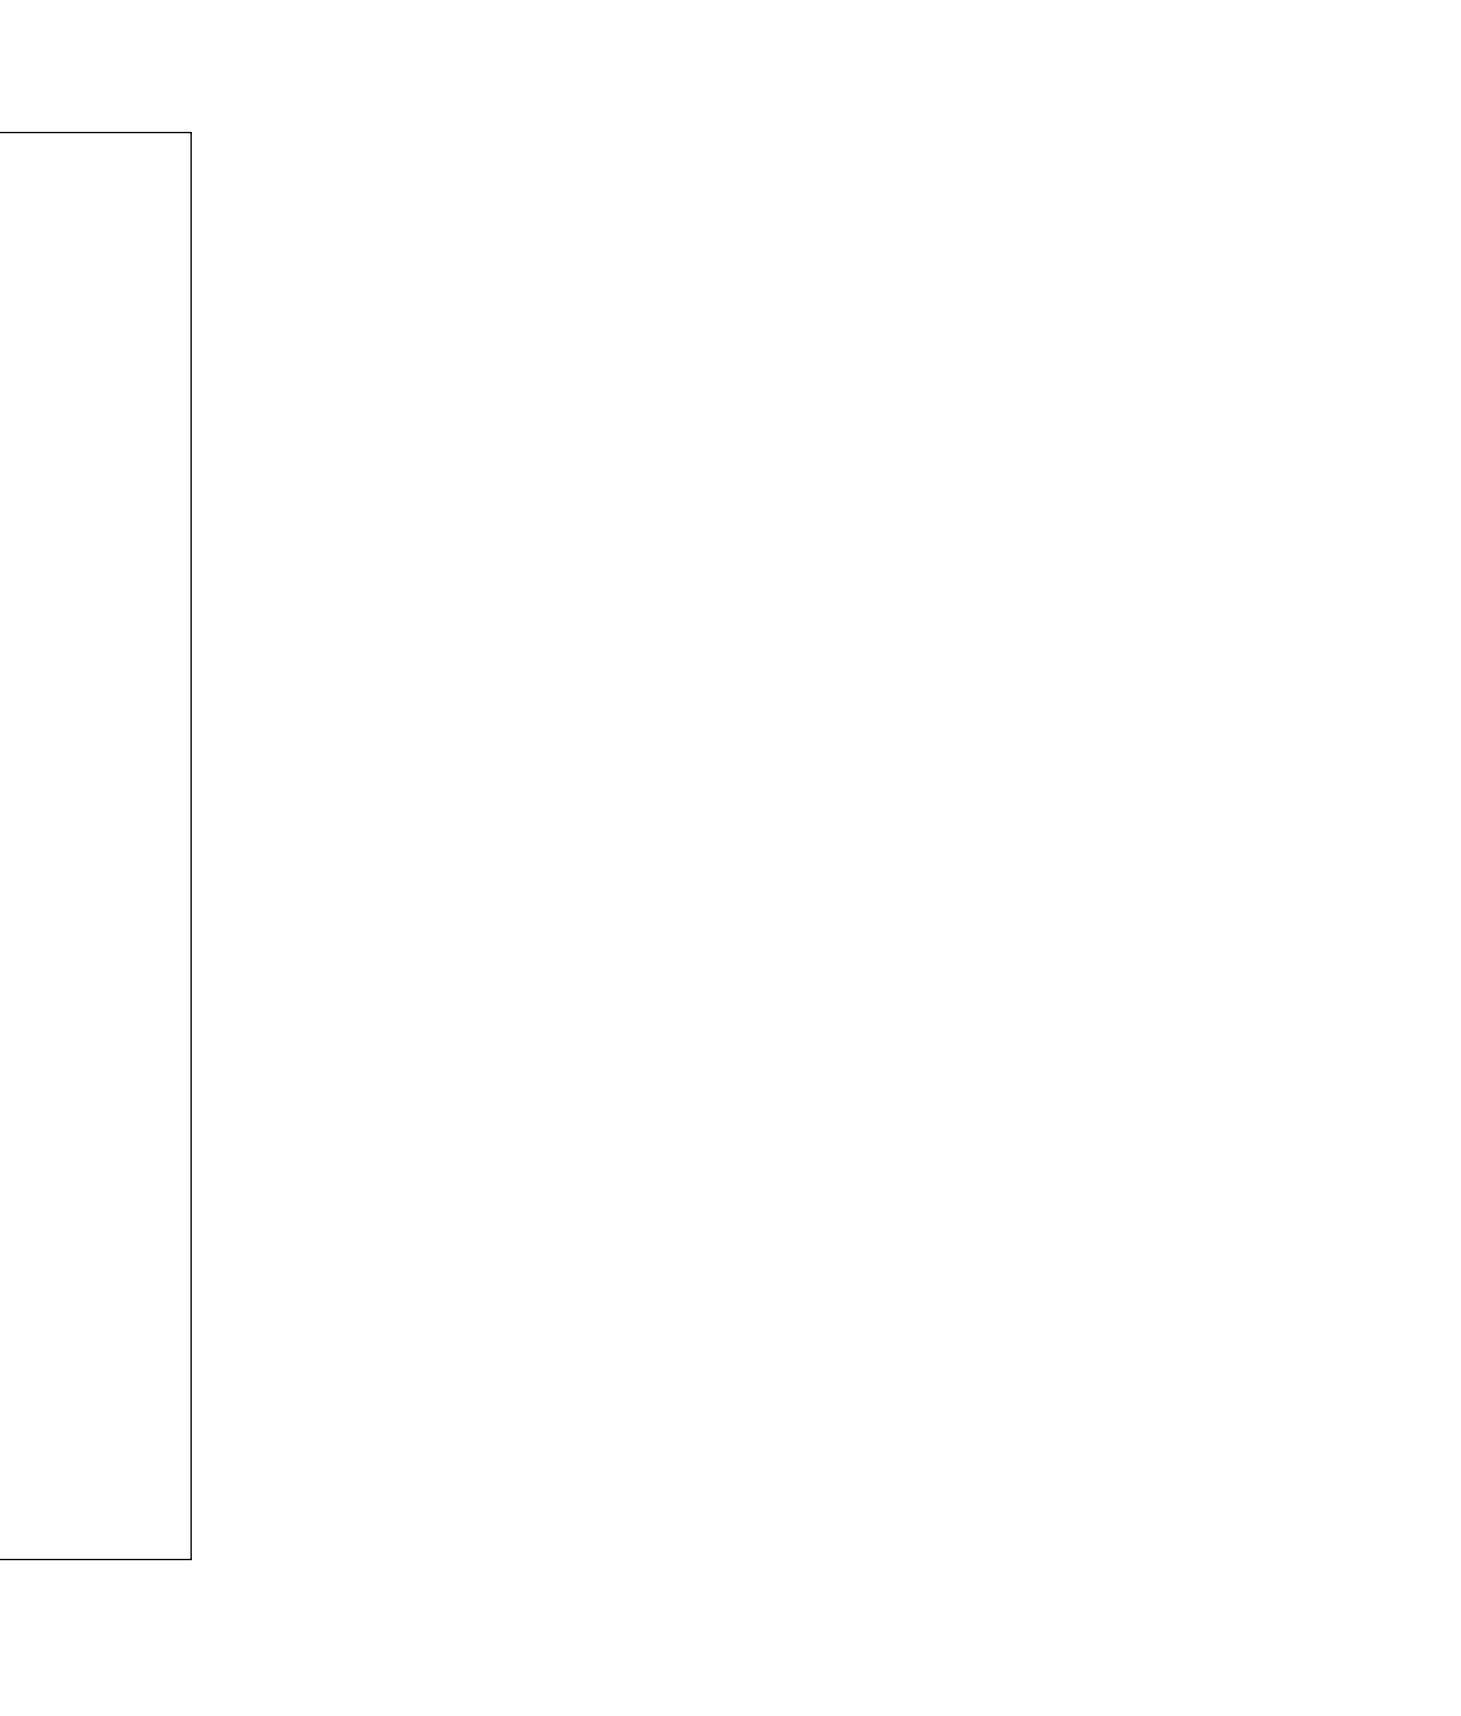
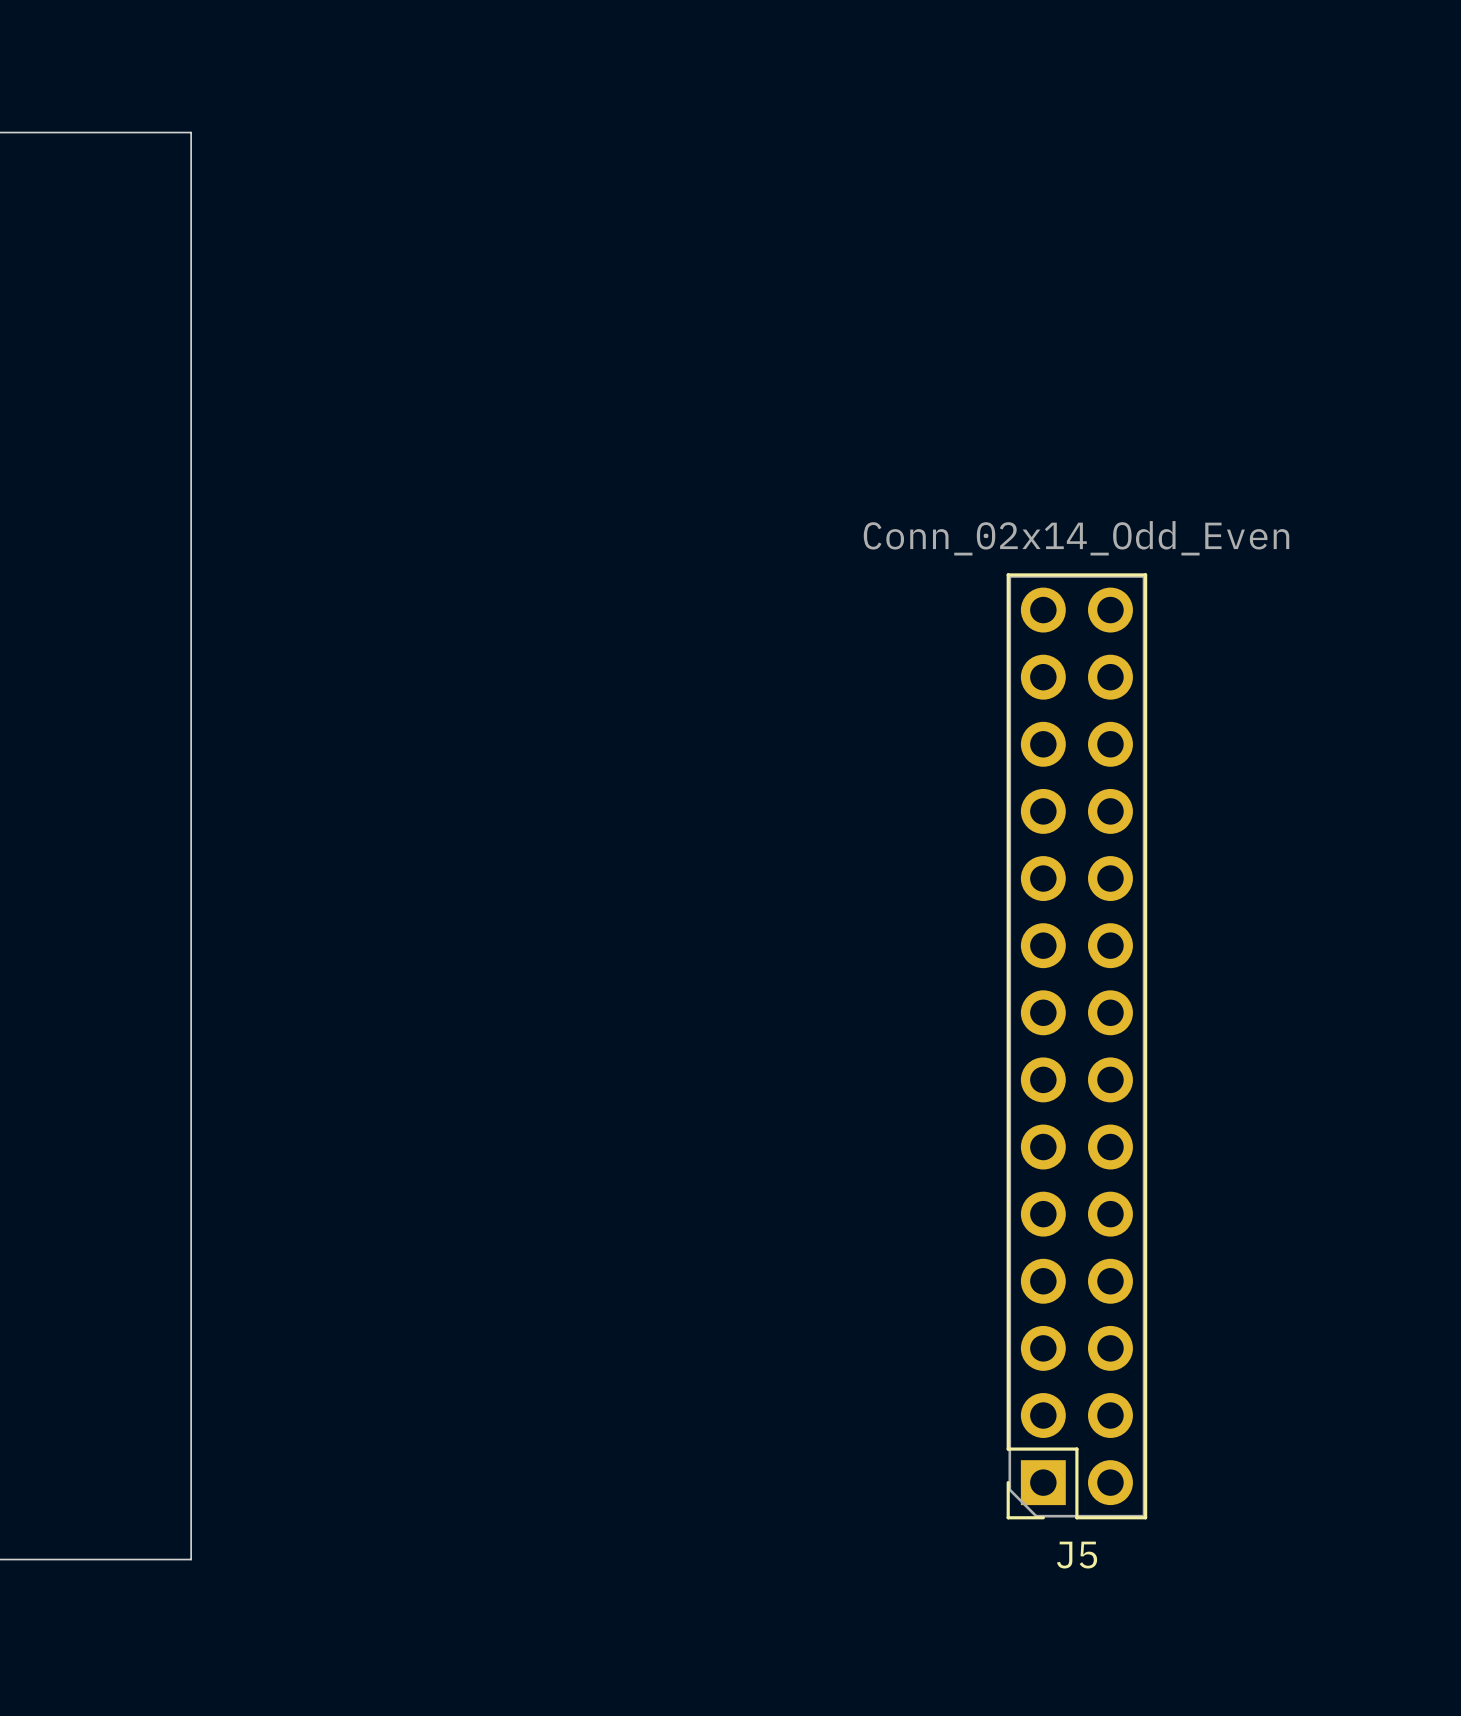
J5: none -> Conn_02x14_Odd_Even (1076, 1046)

